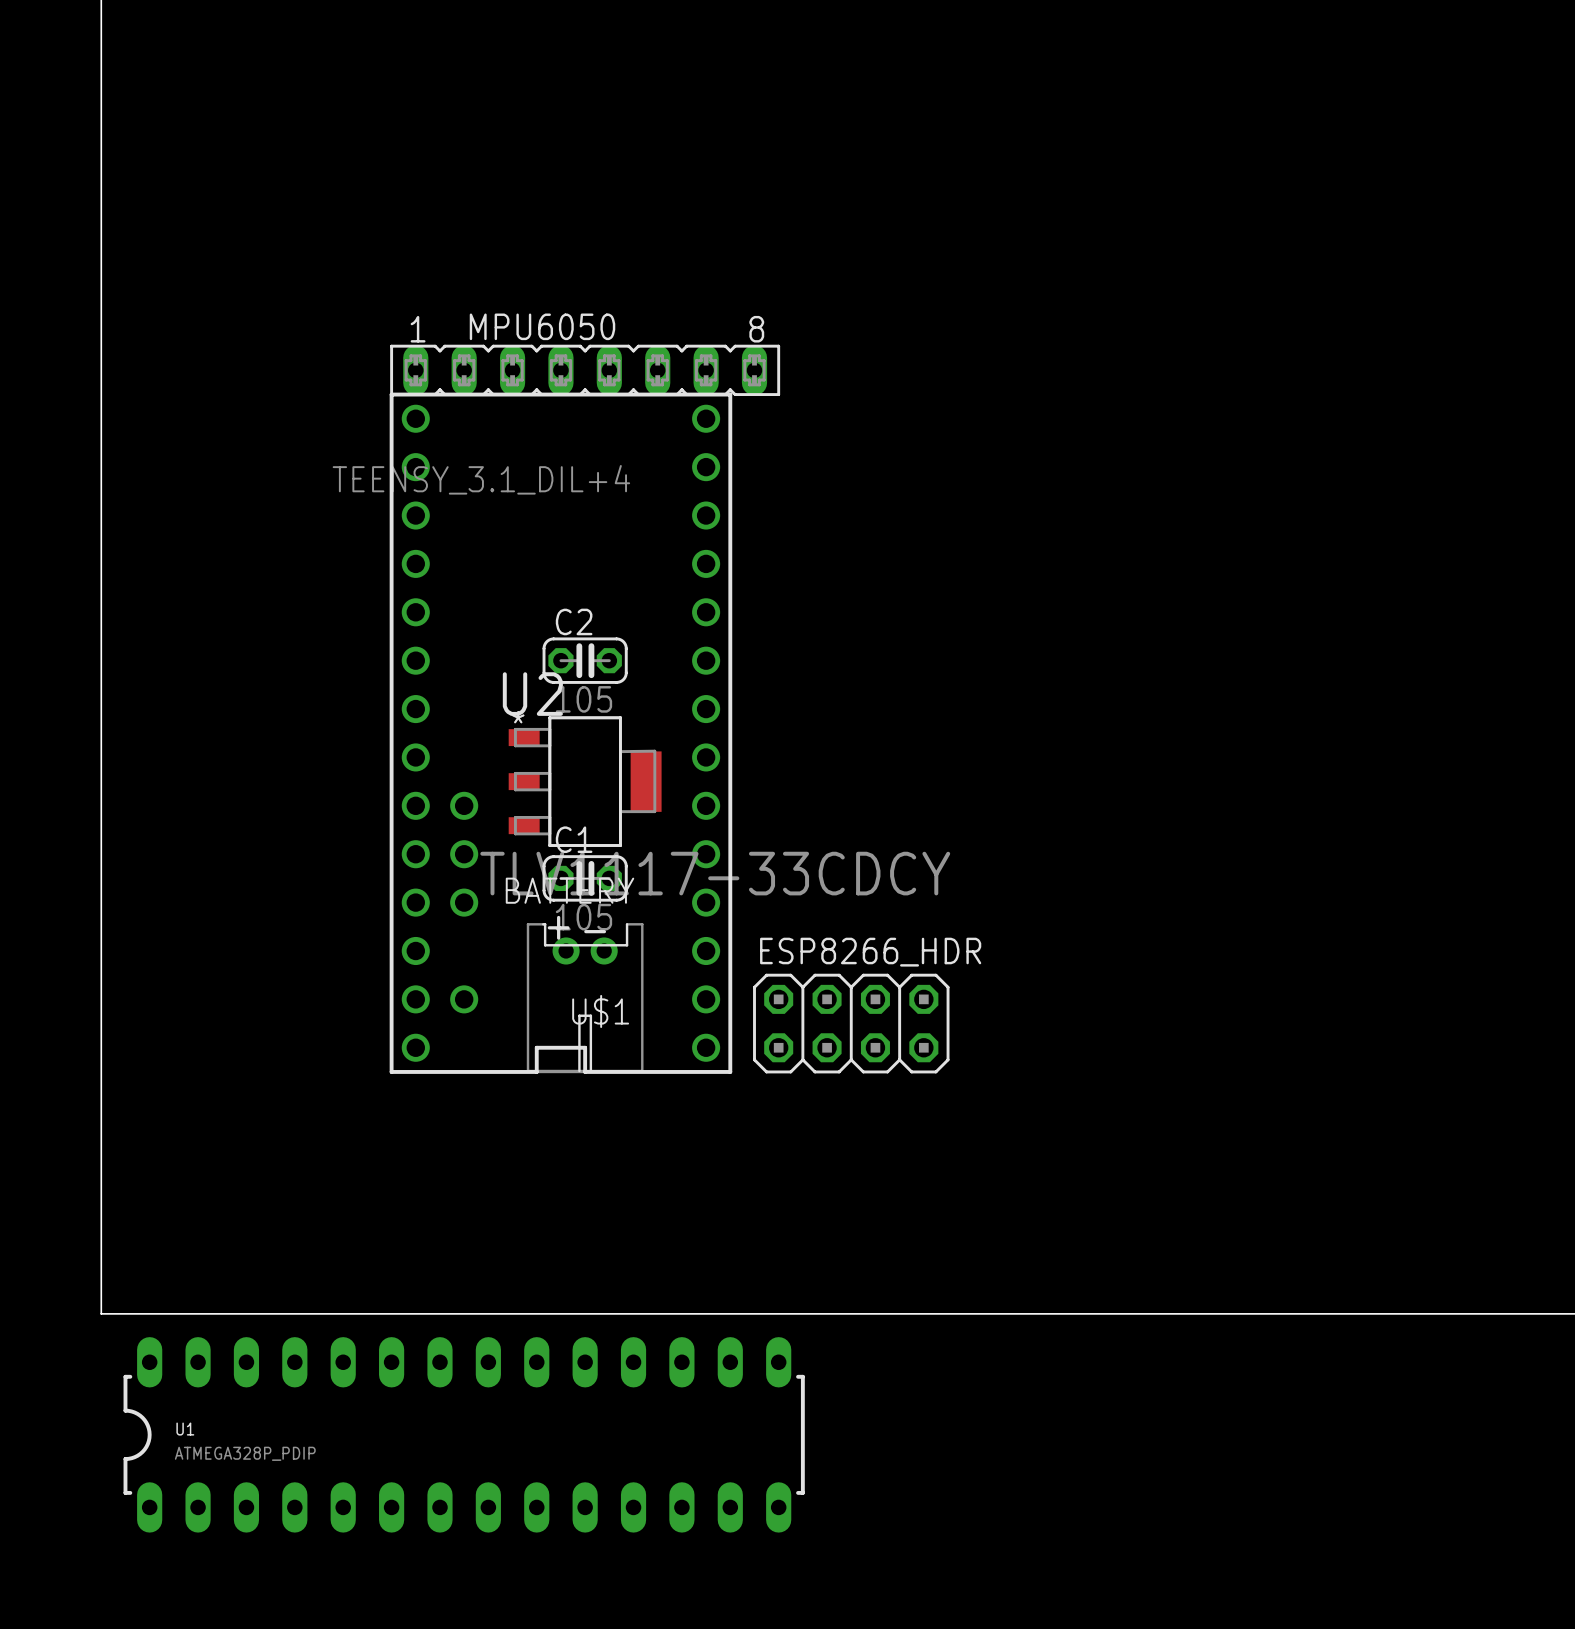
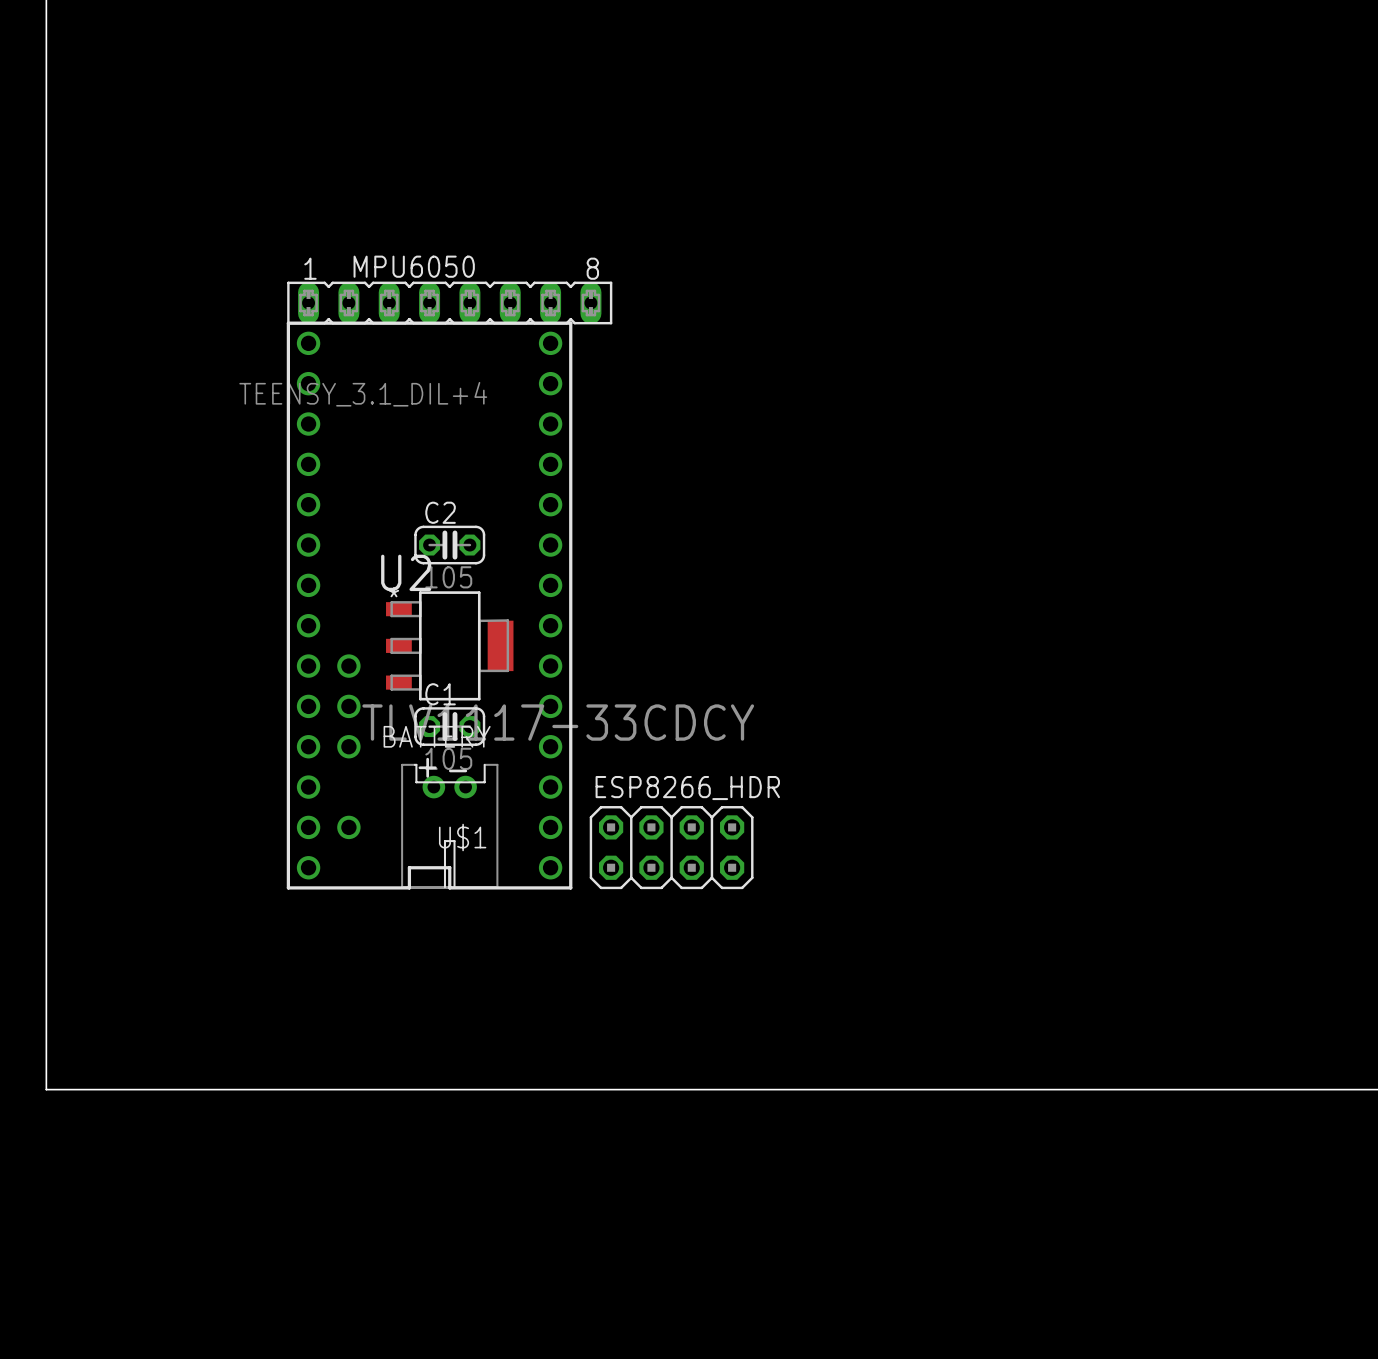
U1: ATMEGA328P_PDIP (464, 1434) -> none

